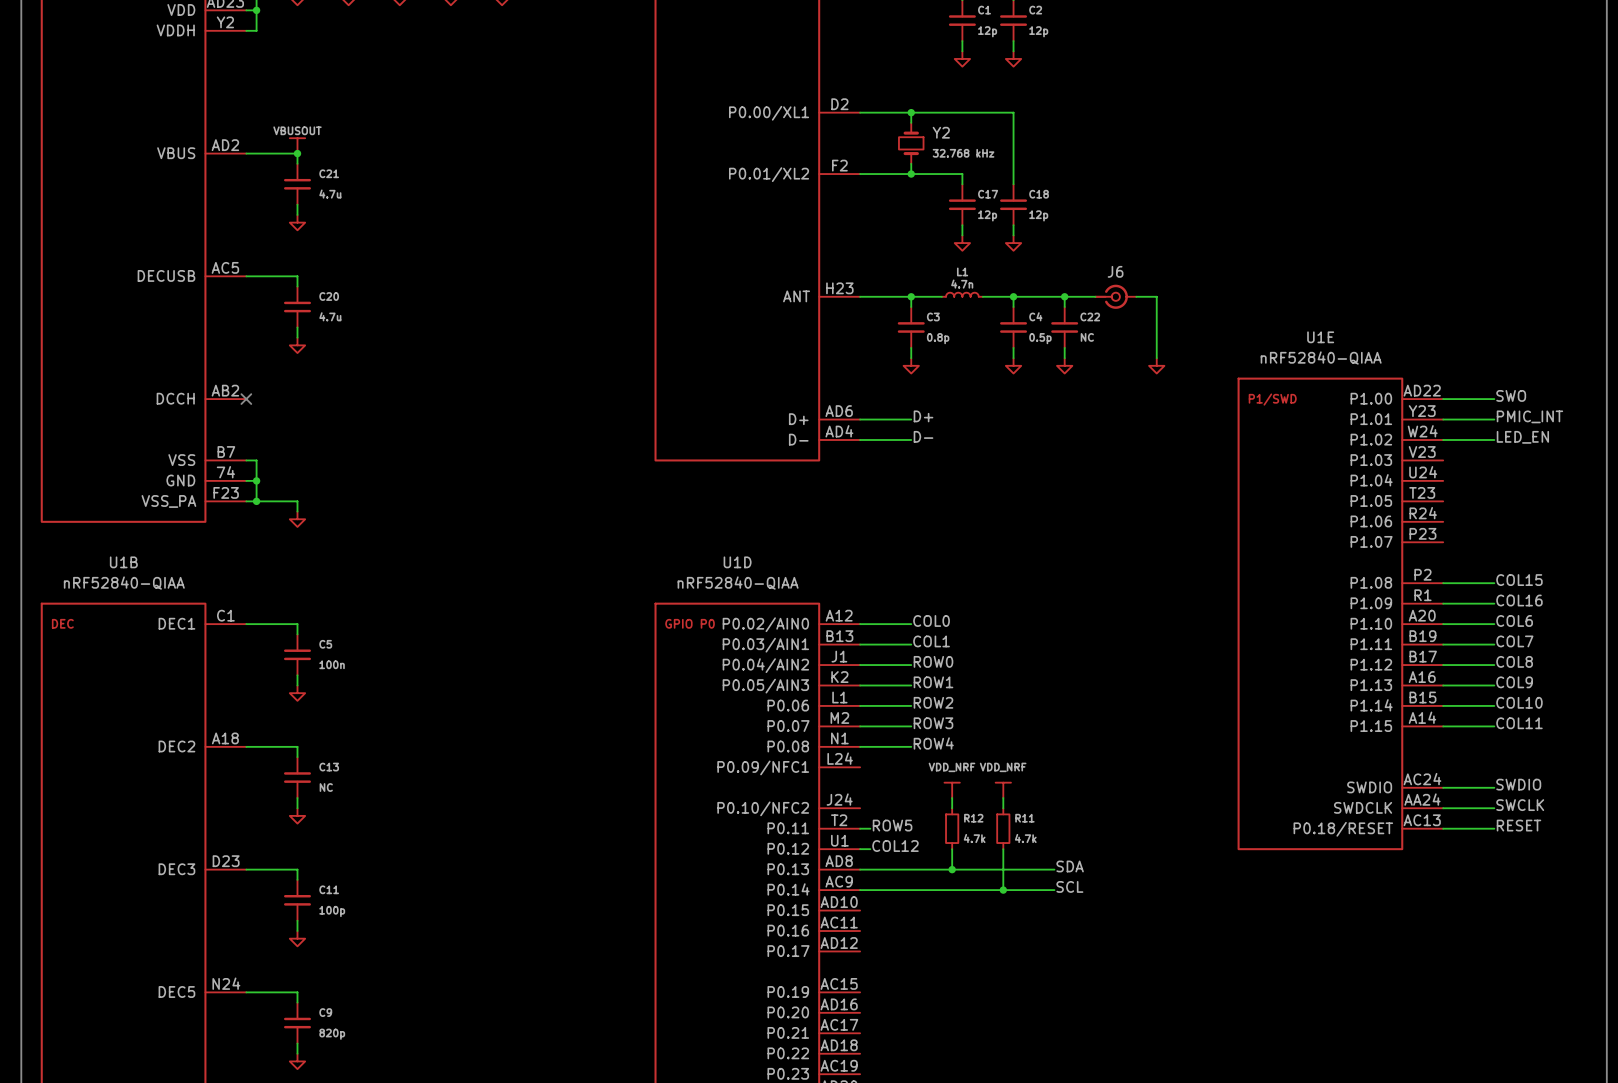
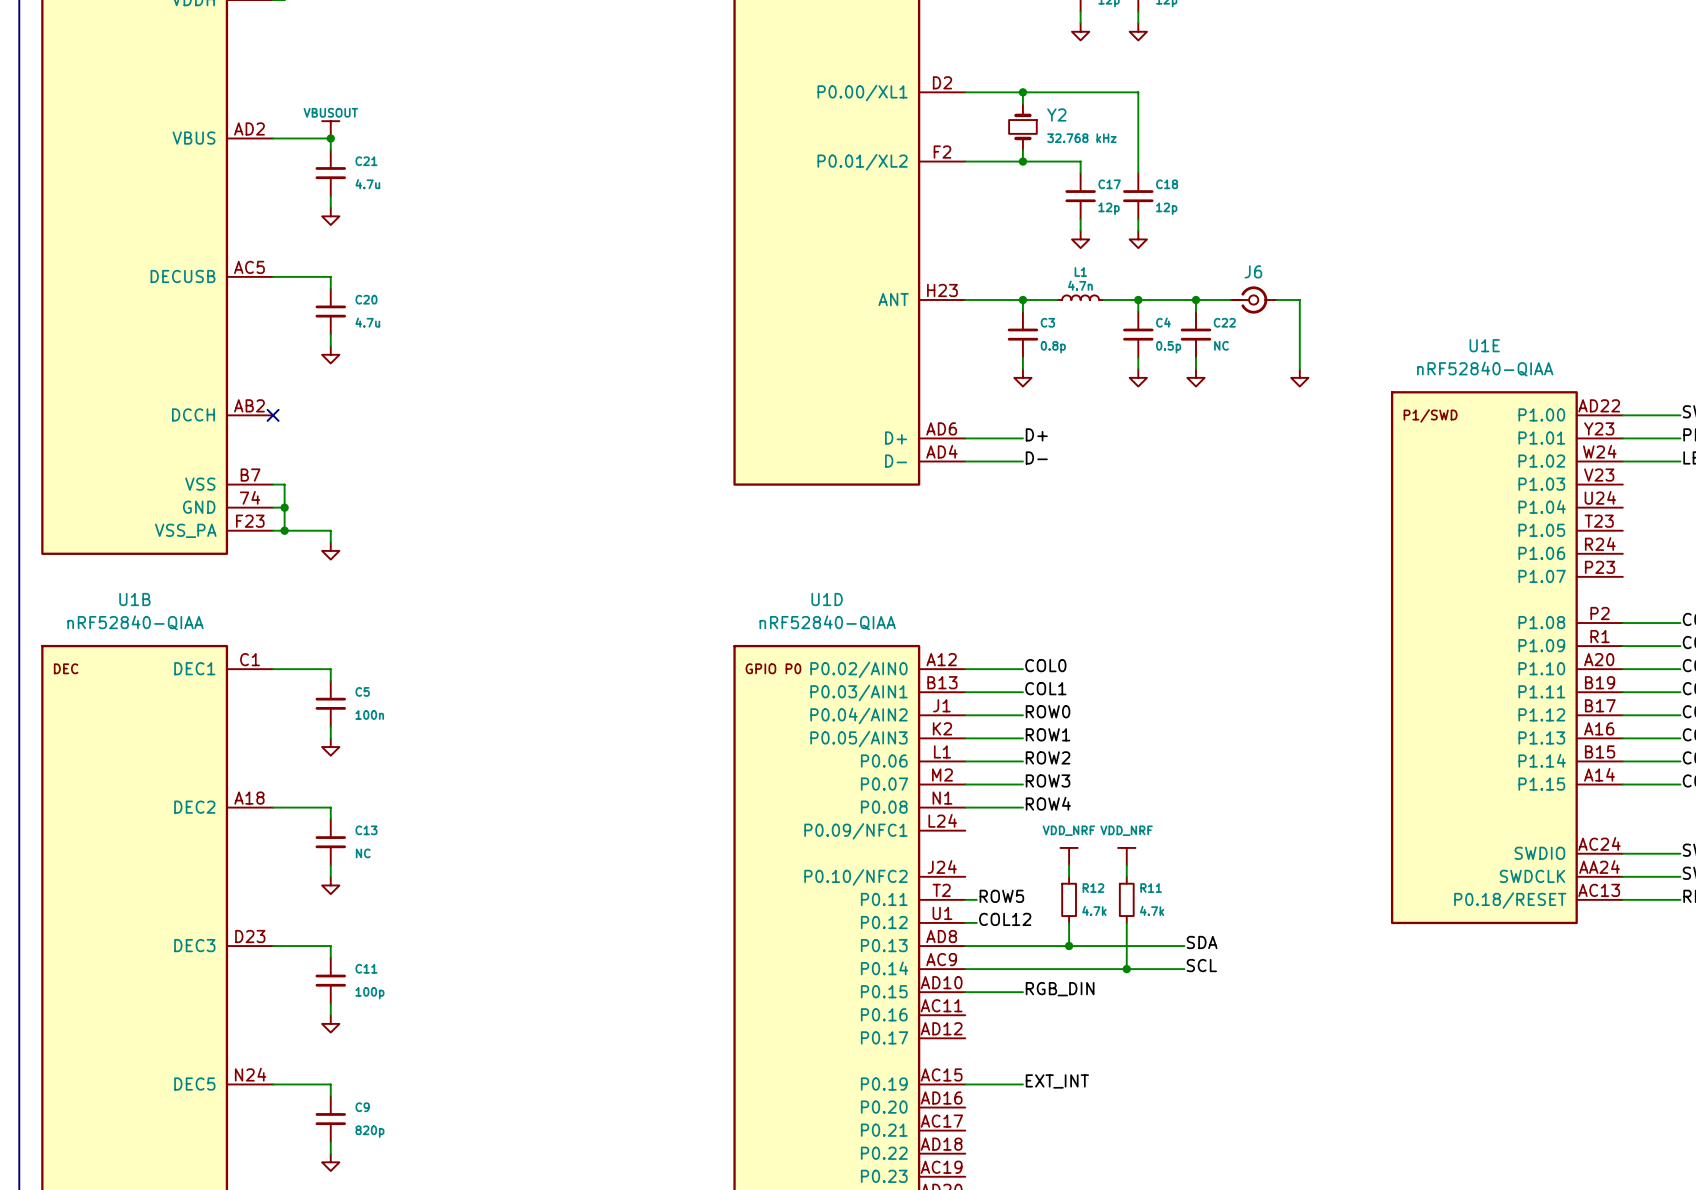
label: none -> RGB_DIN (1060, 989)
wire: none -> (965, 992) (1022, 992)
label: none -> EXT_INT (1057, 1081)
wire: none -> (965, 1084) (1022, 1084)

